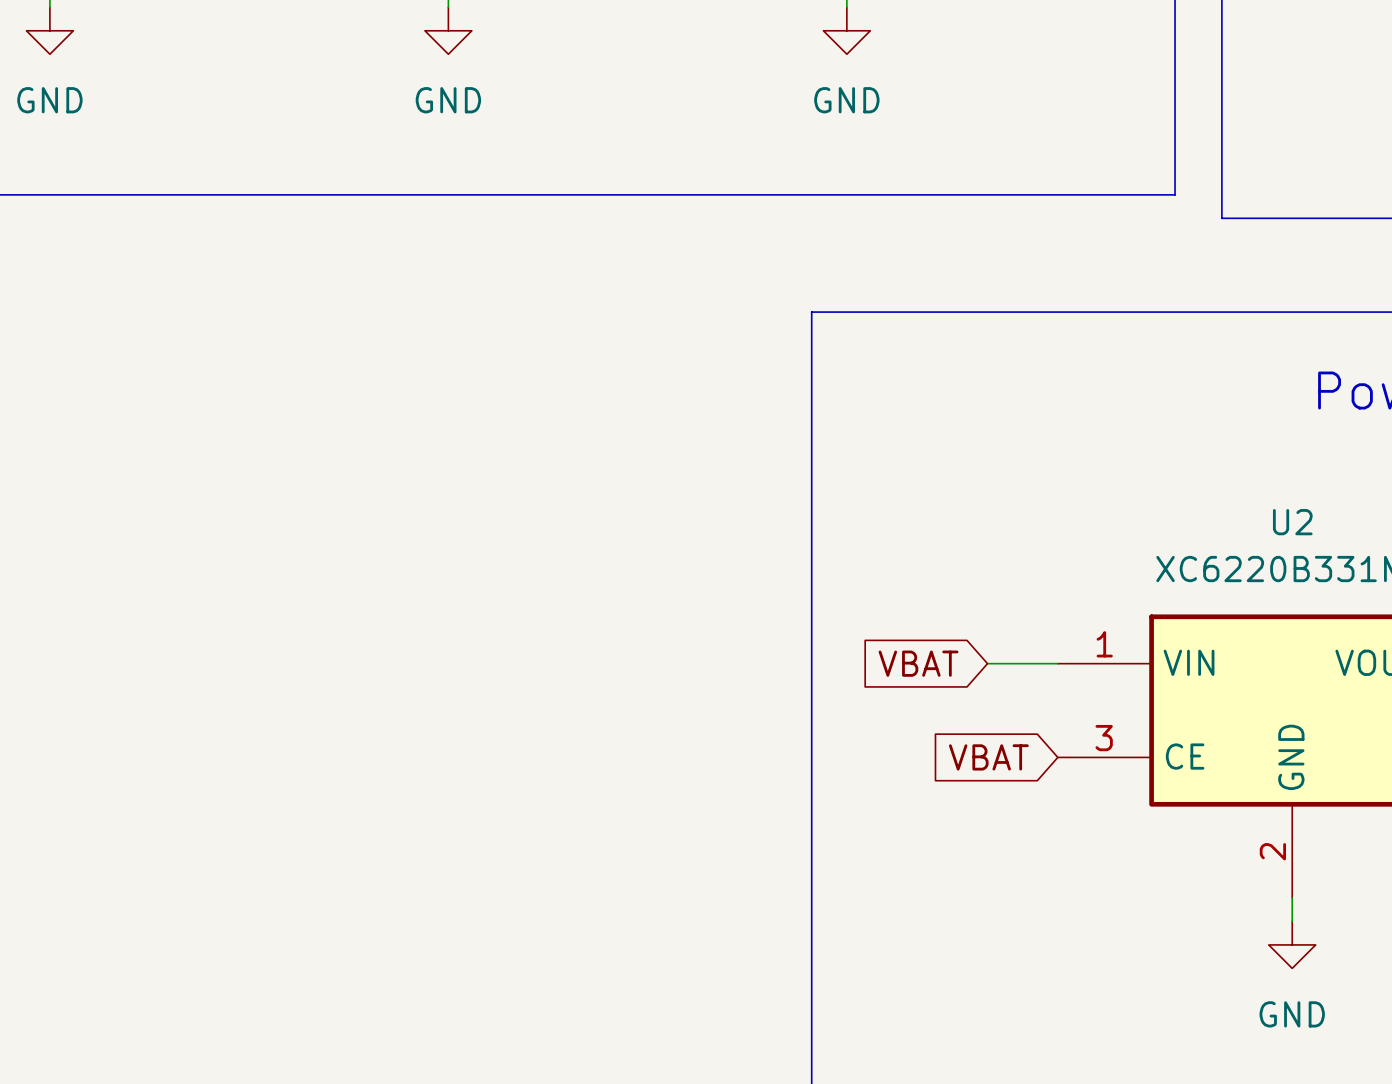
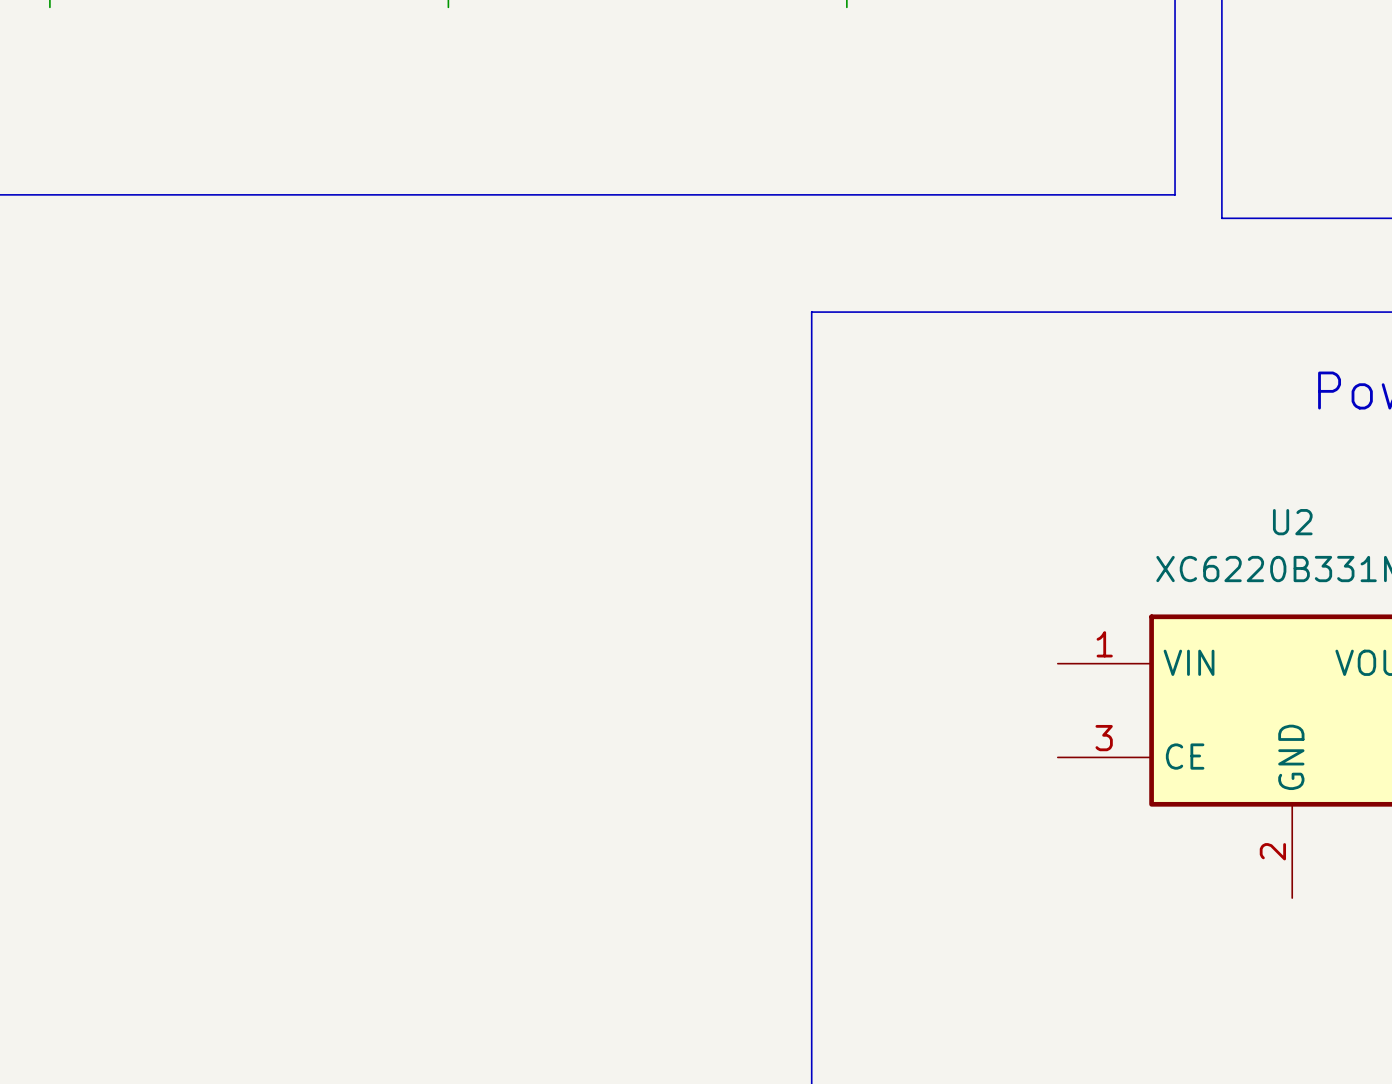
power symbol: GND (49, 30) -> none
power symbol: GND (448, 30) -> none
power symbol: GND (846, 30) -> none
global label: VBAT (918, 663) -> none
wire: (987, 663) (1057, 663) -> none
global label: VBAT (988, 757) -> none
wire: (1292, 898) (1292, 921) -> none
power symbol: GND (1292, 944) -> none

